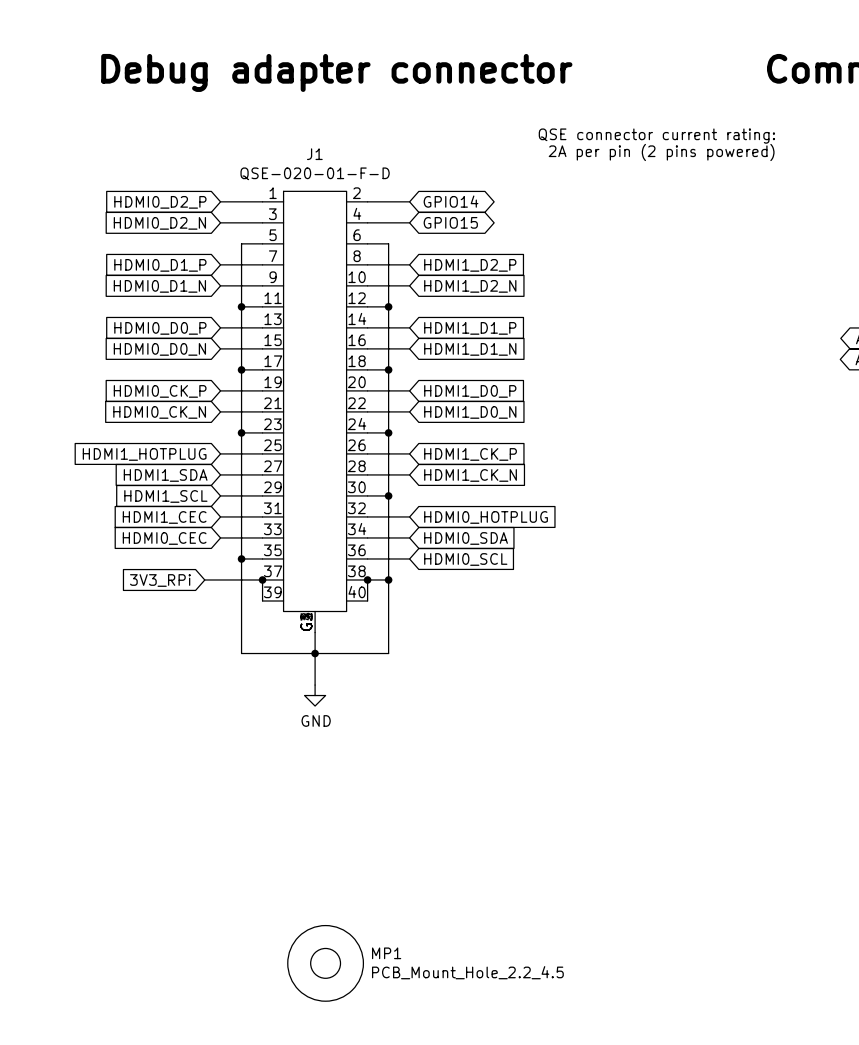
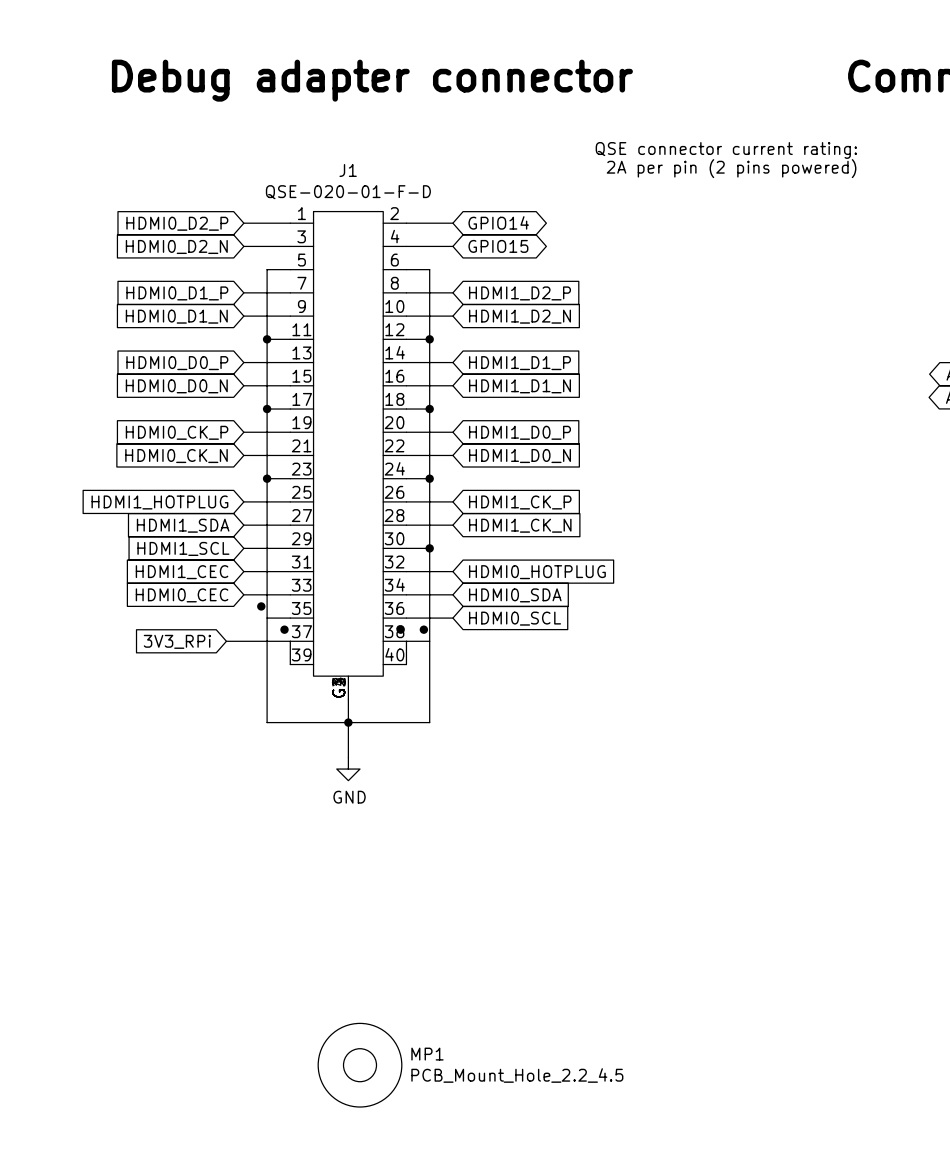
junction: none -> (261, 606)
junction: (241, 558) -> none
junction: none -> (284, 629)
junction: none -> (400, 629)
junction: none -> (423, 629)
junction: (262, 579) -> none
junction: (367, 579) -> none
junction: (388, 579) -> none

